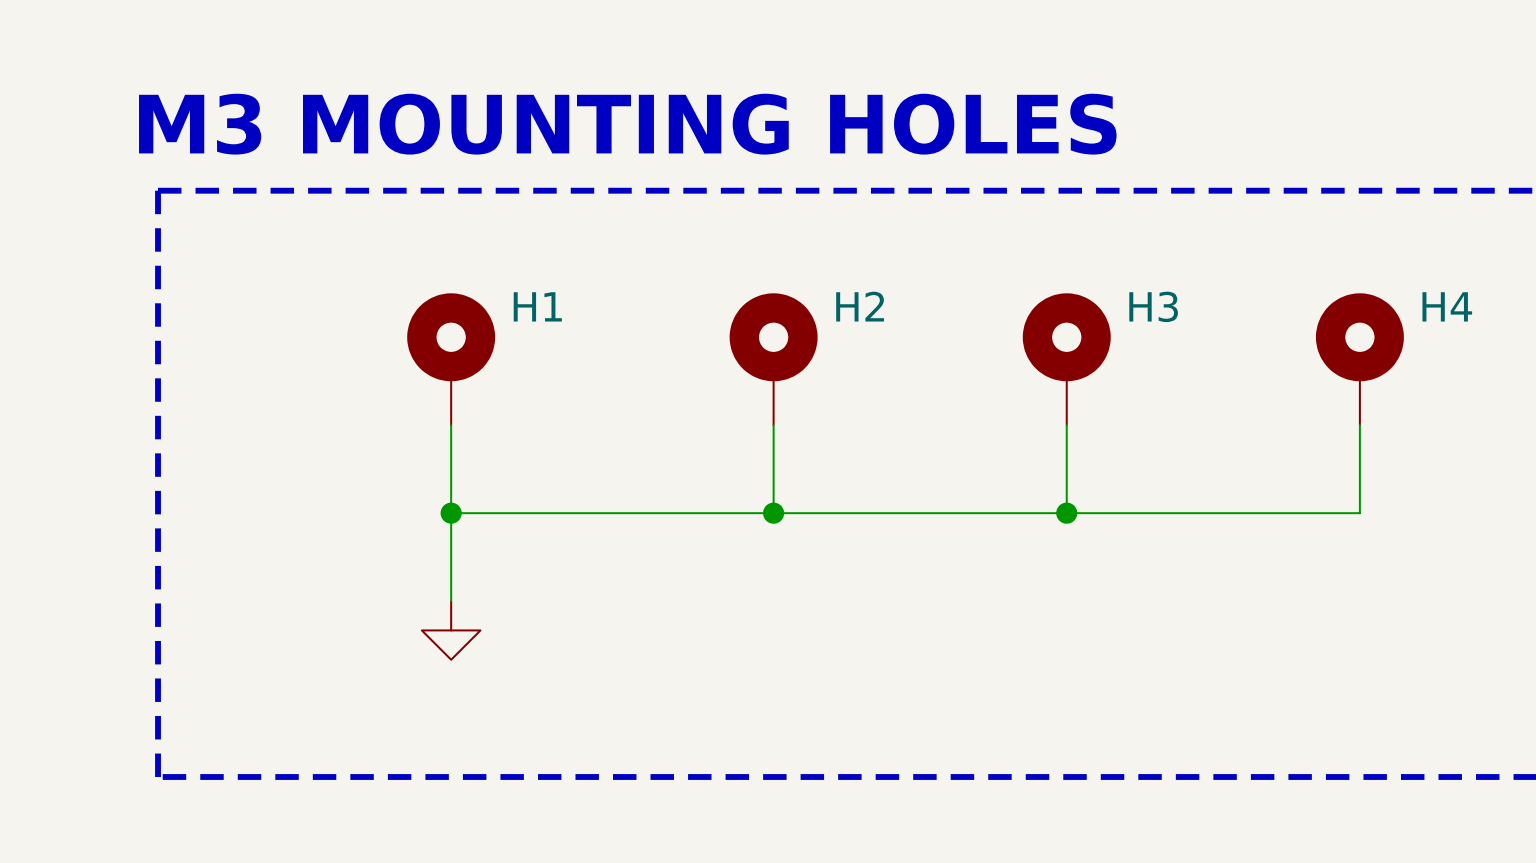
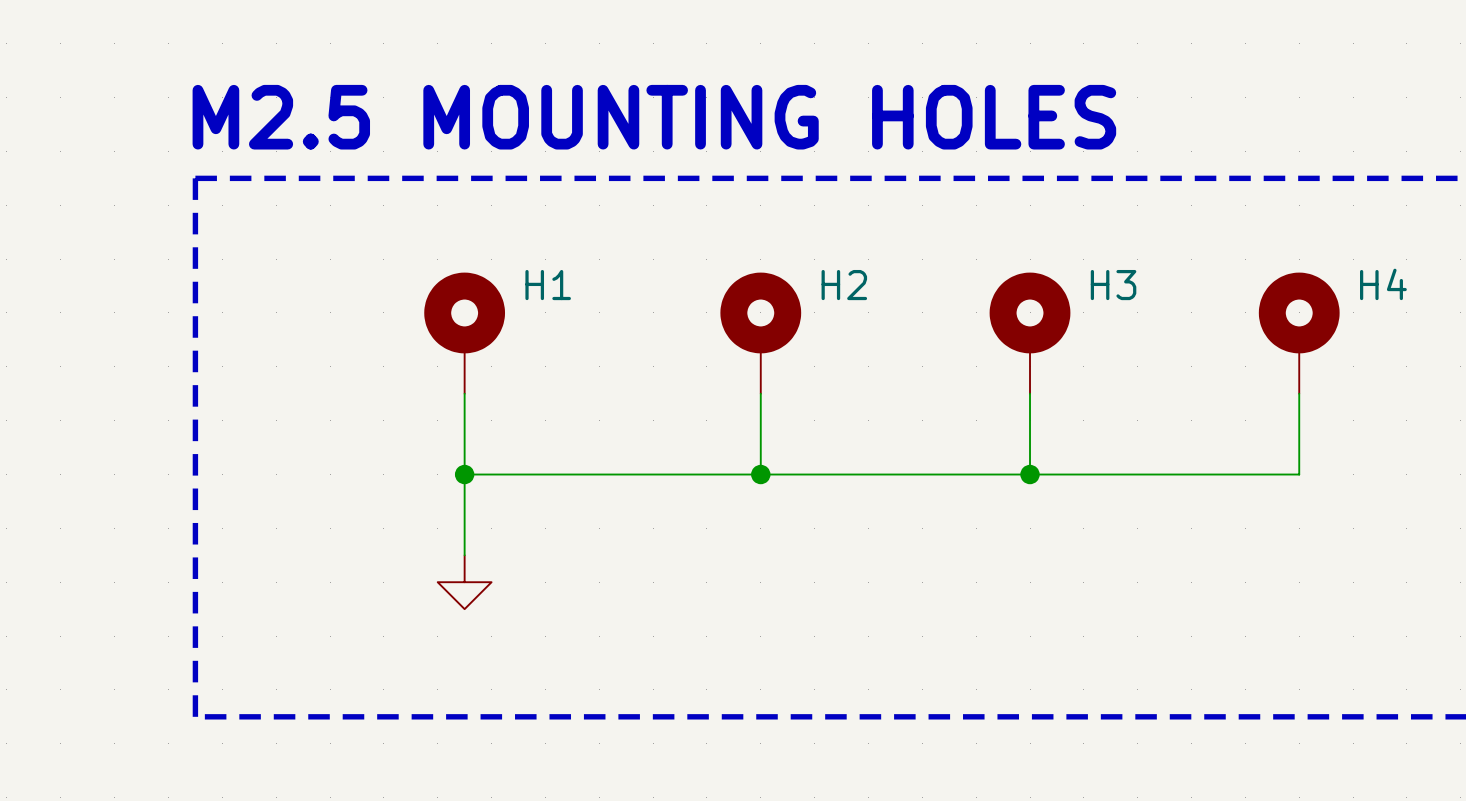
text: M3 MOUNTING HOLES (627, 124) -> M2.5 MOUNTING HOLES (654, 117)

